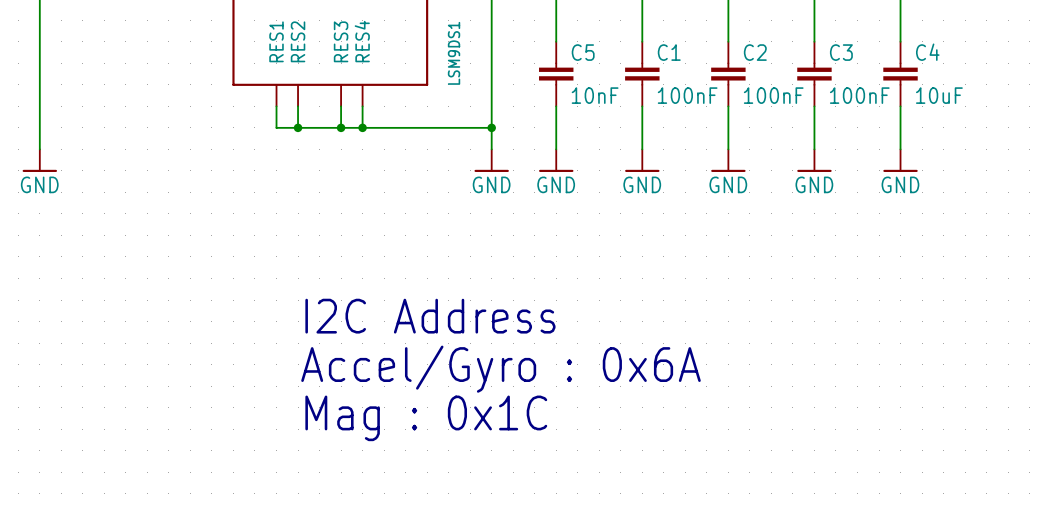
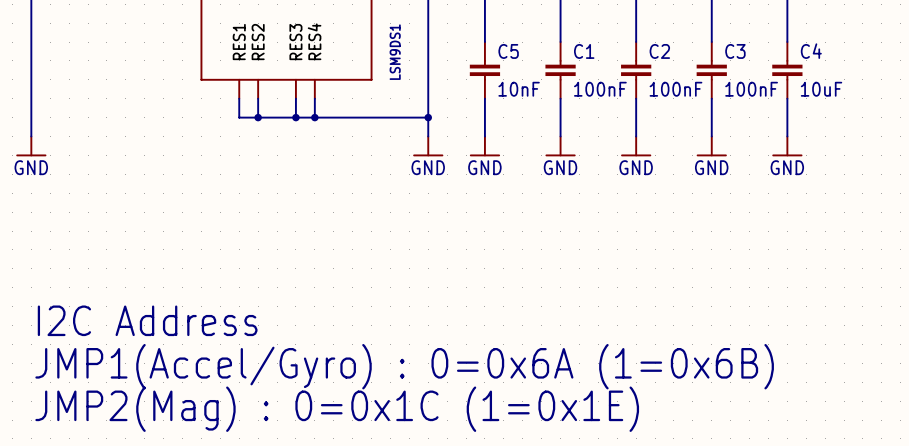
text: I2C Address (430, 316) -> none
text: none -> I2C Address (147, 320)
text: Accel/Gyro : 0x6A (500, 369) -> none
text: none -> JMP1(Accel/Gyro) : 0=0x6A (1=0x6B) (404, 366)
text: Mag : 0x1C (426, 418) -> none
text: none -> JMP2(Mag) : 0=0x1C (1=0x1E) (337, 409)

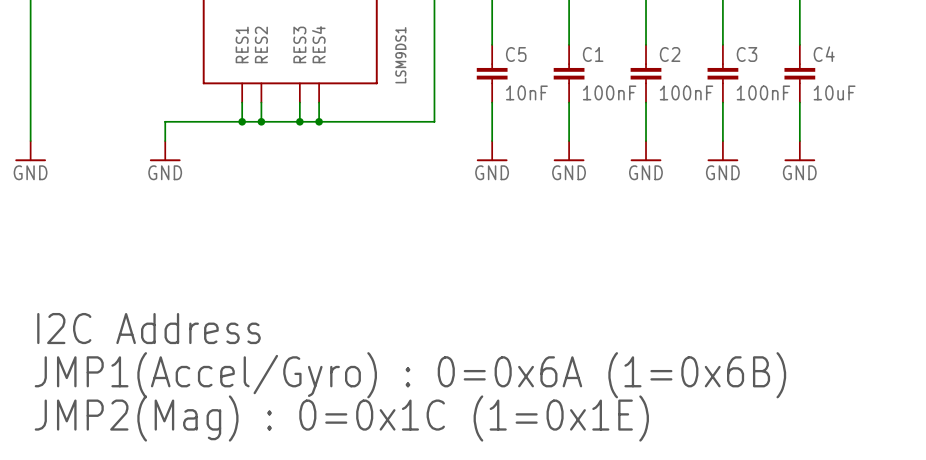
wire: none -> (242, 121) (165, 121) (165, 141)
junction: none -> (242, 121)
wire: (428, 117) (428, 136) -> none
junction: (428, 117) -> none
power symbol: none -> GND (165, 151)
power symbol: GND (428, 146) -> none

